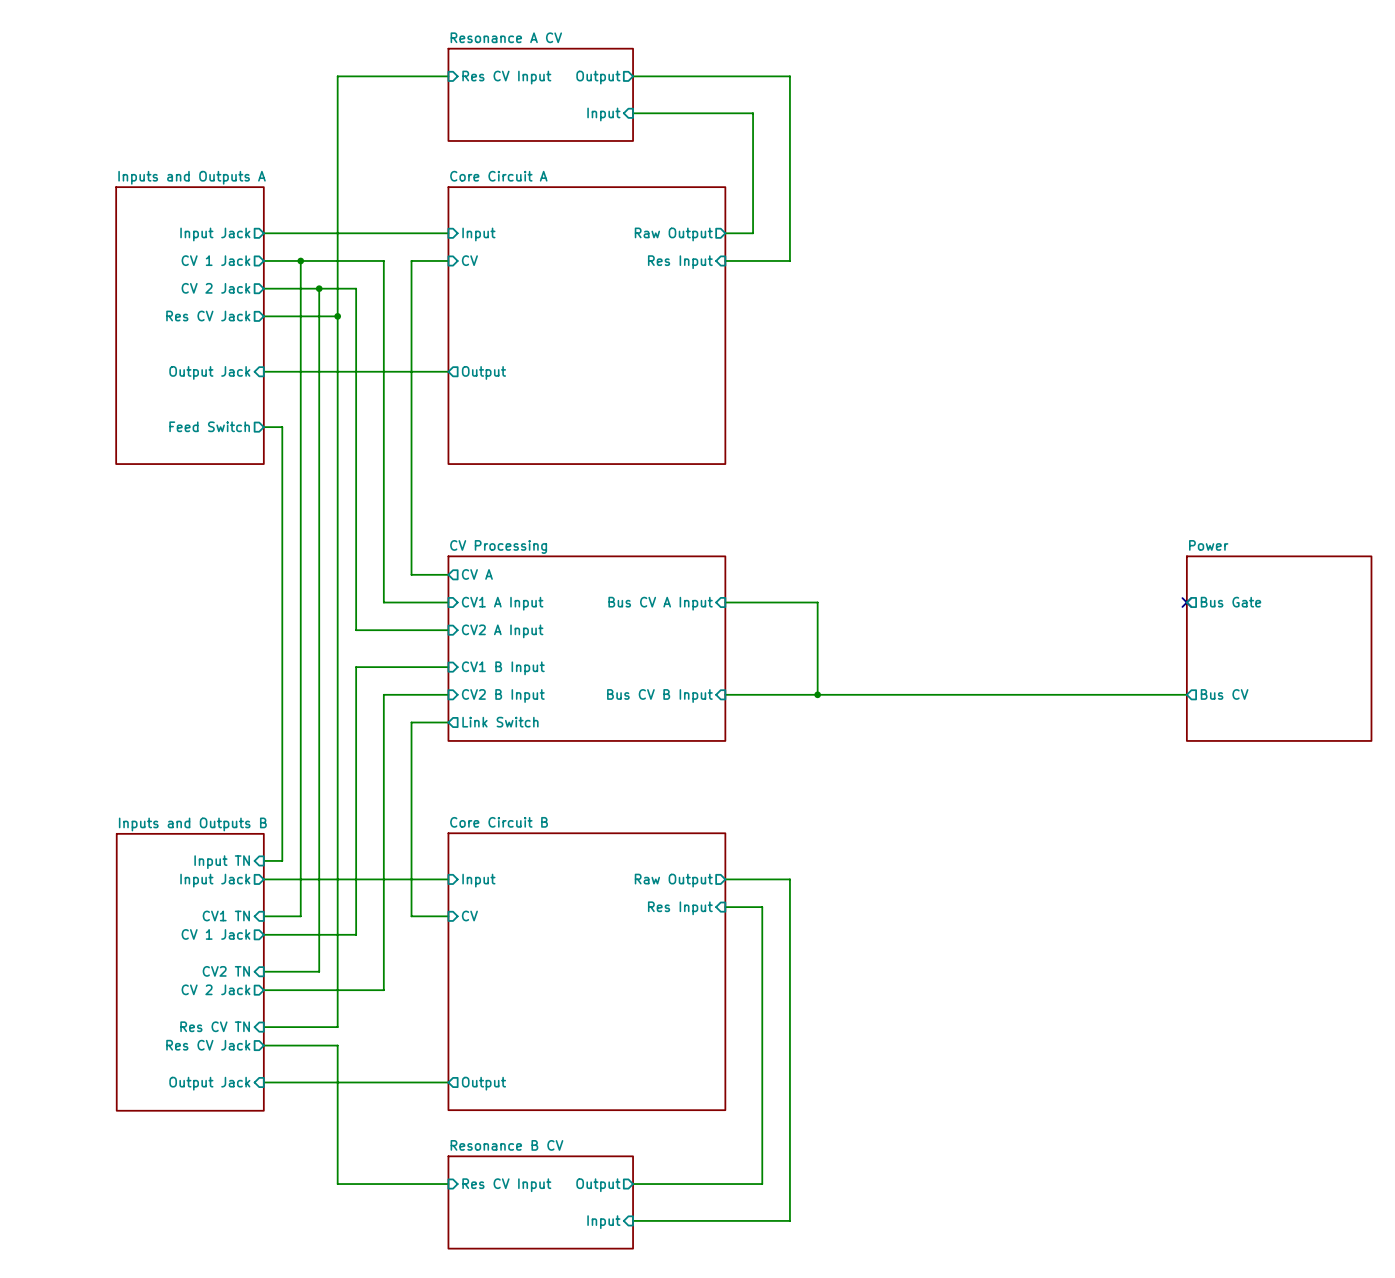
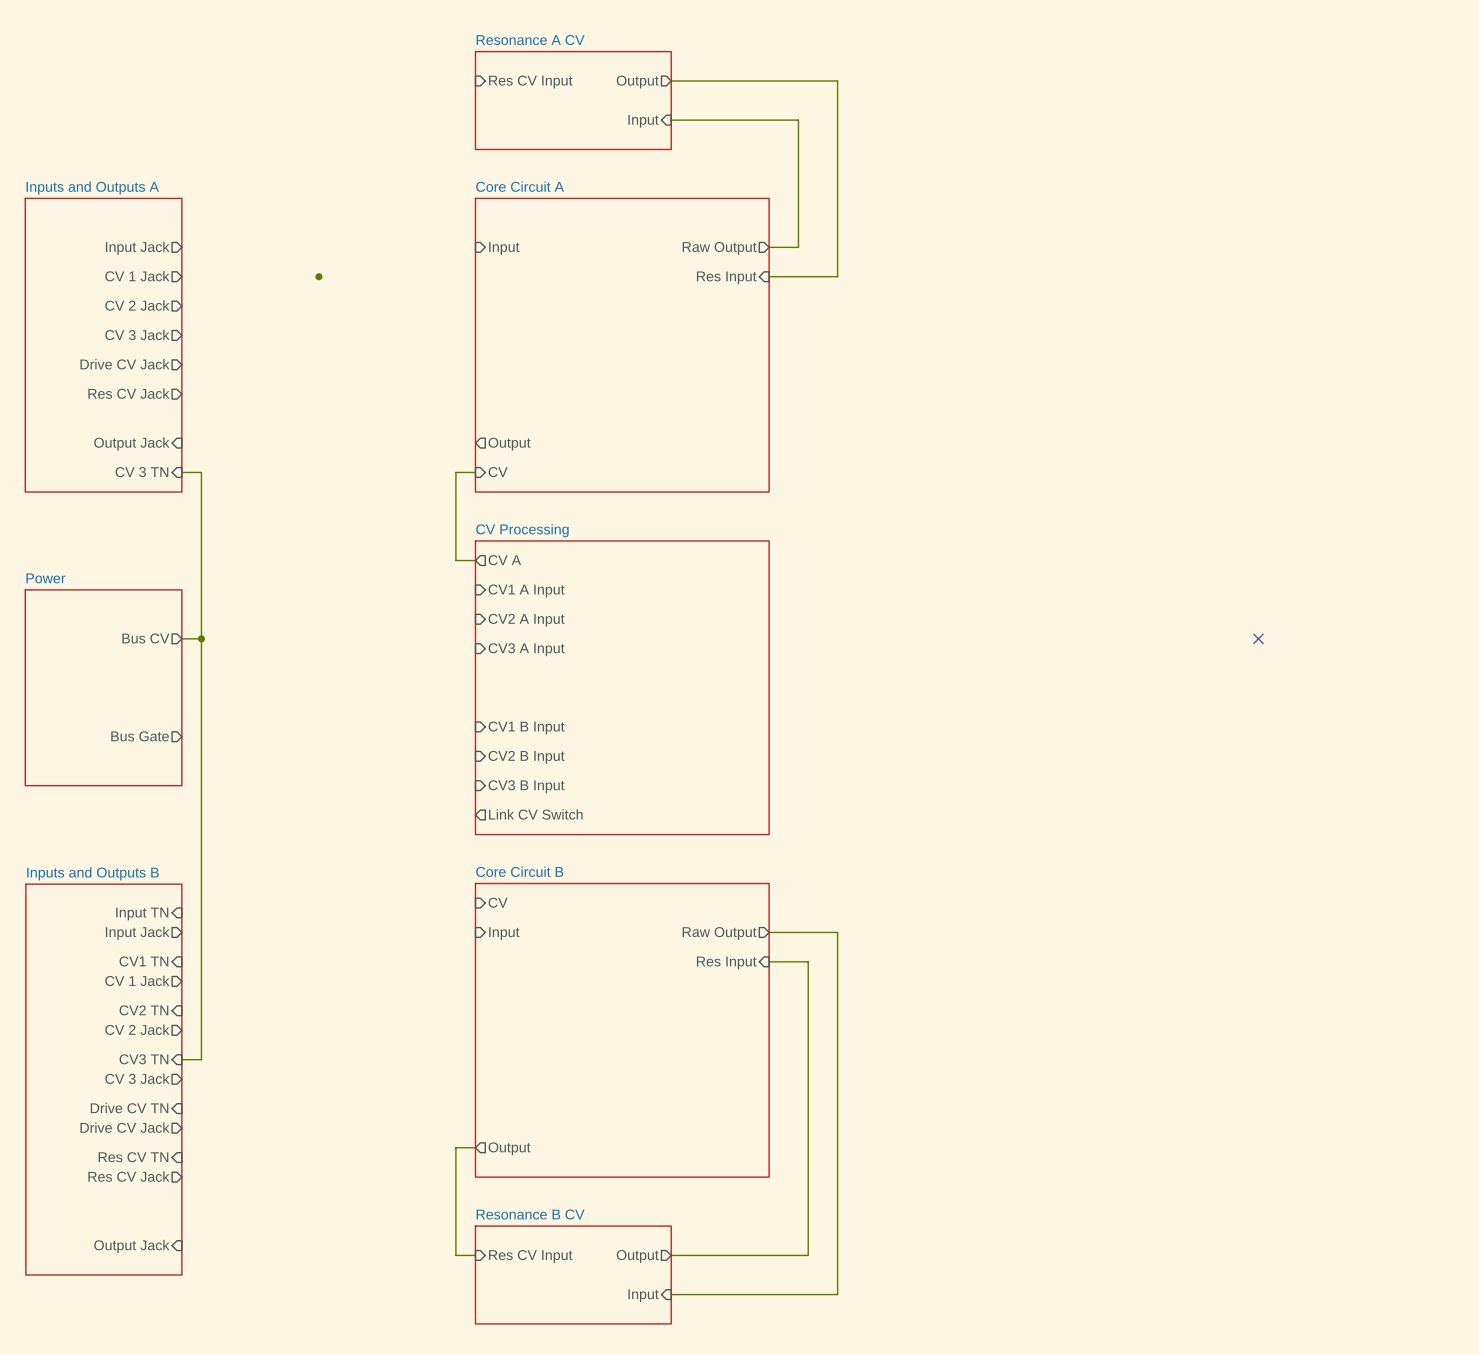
wire: (448, 76) (337, 76) (337, 1027) (263, 1027) -> none
wire: (263, 233) (448, 233) -> none
sheet pin position: Input Jack (215, 234) -> Input Jack (137, 248)
sheet pin position: CV 1 Jack (216, 260) -> CV 1 Jack (137, 276)
wire: (263, 260) (383, 260) (383, 602) (448, 602) -> none
wire: (300, 260) (300, 916) (263, 916) -> none
wire: (448, 260) (411, 260) (411, 574) (448, 574) -> none
sheet pin: CV (469, 260) -> none
sheet pin position: CV 2 Jack (216, 288) -> CV 2 Jack (137, 305)
wire: (263, 288) (356, 288) (356, 630) (448, 630) -> none
wire: (319, 288) (319, 971) (263, 971) -> none
junction: (319, 288) -> none
sheet pin: none -> CV 3 Jack (137, 334)
sheet pin position: Res CV Jack (208, 316) -> Res CV Jack (128, 393)
wire: (263, 316) (337, 316) -> none
junction: (337, 316) -> none
sheet Inputs and Outputs A position: (189, 325) -> (103, 345)
sheet pin: none -> Drive CV Jack (124, 364)
wire: (263, 371) (448, 371) -> none
sheet pin position: Output Jack (209, 372) -> Output Jack (131, 443)
sheet pin position: Output (483, 372) -> Output (509, 444)
sheet pin: Feed Switch (209, 426) -> none
wire: (263, 427) (282, 427) (282, 860) (263, 860) -> none
sheet pin: none -> CV 3 TN (141, 472)
wire: none -> (181, 472) (201, 472) (201, 1059) (181, 1059)
wire: none -> (475, 472) (455, 472) (455, 560) (475, 560)
sheet pin: none -> CV (498, 472)
sheet CV Processing name position: CV Processing (498, 546) -> CV Processing (522, 530)
sheet CV Processing shape: [447, 555, 726, 742] -> [474, 540, 770, 836]
sheet pin position: CV A (477, 574) -> CV A (504, 560)
sheet pin: none -> Bus CV (145, 638)
wire: none -> (181, 638) (201, 638)
junction: none -> (201, 638)
wire: (725, 602) (817, 602) (817, 694) -> none
sheet pin: Bus Gate (1230, 602) -> none
sheet pin position: CV1 A Input (502, 603) -> CV1 A Input (526, 590)
sheet pin: Bus CV A Input (660, 603) -> none
sheet pin: none -> CV3 A Input (526, 649)
sheet pin position: CV2 A Input (502, 631) -> CV2 A Input (526, 620)
sheet Power: none -> (103, 687)
sheet Power: (1279, 648) -> none
wire: (448, 667) (356, 667) (356, 934) (263, 934) -> none
sheet pin position: CV1 B Input (503, 668) -> CV1 B Input (526, 727)
sheet pin: none -> Bus Gate (140, 736)
wire: (448, 694) (383, 694) (383, 990) (263, 990) -> none
wire: (725, 694) (1186, 694) -> none
junction: (817, 694) -> none
sheet pin: Bus CV (1224, 694) -> none
sheet pin position: CV2 B Input (503, 696) -> CV2 B Input (526, 757)
sheet pin: Bus CV B Input (659, 696) -> none
wire: (448, 722) (411, 722) (411, 916) (448, 916) -> none
sheet pin: Link Switch (500, 722) -> none
sheet pin: none -> CV3 B Input (526, 786)
sheet pin: none -> Link CV Switch (535, 814)
sheet pin position: Input TN (222, 862) -> Input TN (142, 913)
wire: (263, 879) (448, 879) -> none
sheet pin position: Input Jack (215, 880) -> Input Jack (137, 933)
sheet pin position: CV1 TN (226, 915) -> CV1 TN (143, 961)
sheet pin position: CV (469, 915) -> CV (498, 902)
sheet pin position: CV 1 Jack (216, 934) -> CV 1 Jack (137, 980)
sheet pin position: CV2 TN (226, 971) -> CV2 TN (143, 1010)
sheet Inputs and Outputs B: (190, 972) -> none
sheet pin position: CV 2 Jack (216, 989) -> CV 2 Jack (137, 1029)
sheet pin: none -> CV3 TN (143, 1059)
sheet pin: none -> CV 3 Jack (137, 1078)
sheet Inputs and Outputs B: none -> (103, 1079)
sheet pin position: Res CV TN (215, 1026) -> Res CV TN (133, 1157)
sheet pin: none -> Drive CV TN (129, 1108)
sheet pin position: Res CV Jack (208, 1045) -> Res CV Jack (128, 1176)
wire: (263, 1045) (337, 1045) (337, 1184) (429, 1184) -> (455, 1147) (455, 1255)
sheet pin: none -> Drive CV Jack (124, 1127)
wire: (263, 1082) (429, 1082) -> none
sheet pin position: Output Jack (209, 1083) -> Output Jack (131, 1246)

